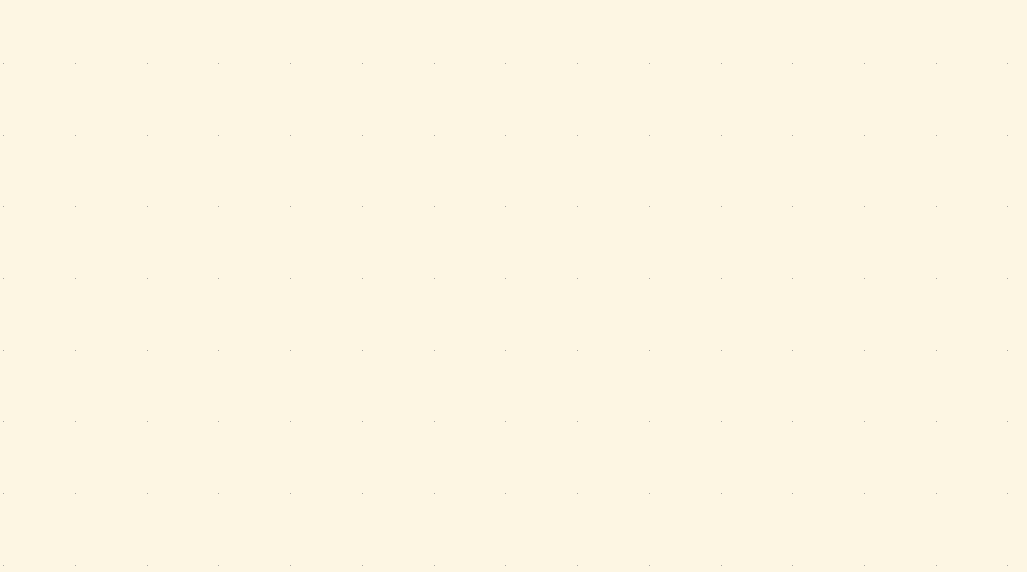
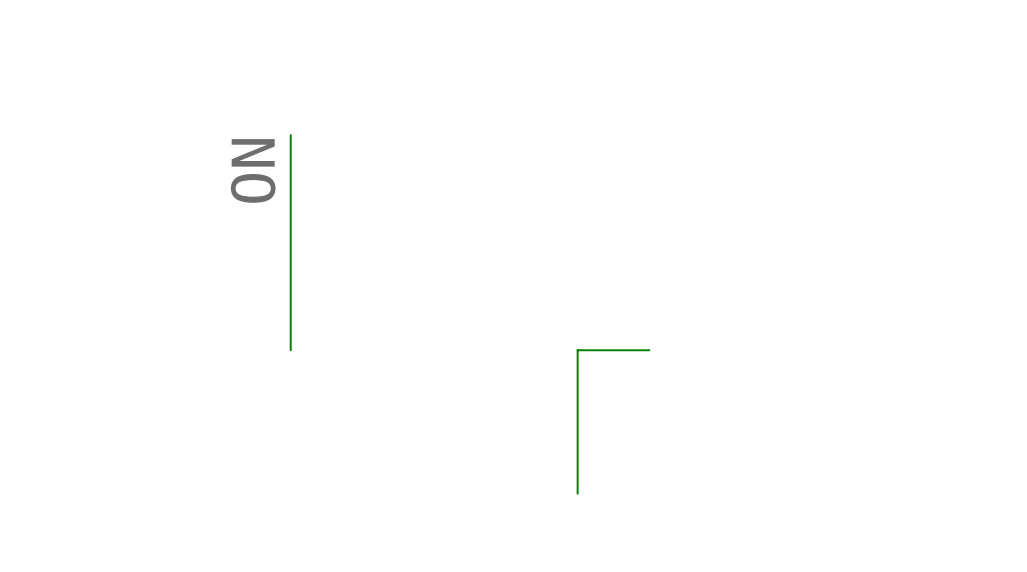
wire: none -> (290, 135) (290, 350)
label: none -> ON (253, 170)
wire: none -> (649, 350) (577, 350) (577, 493)

